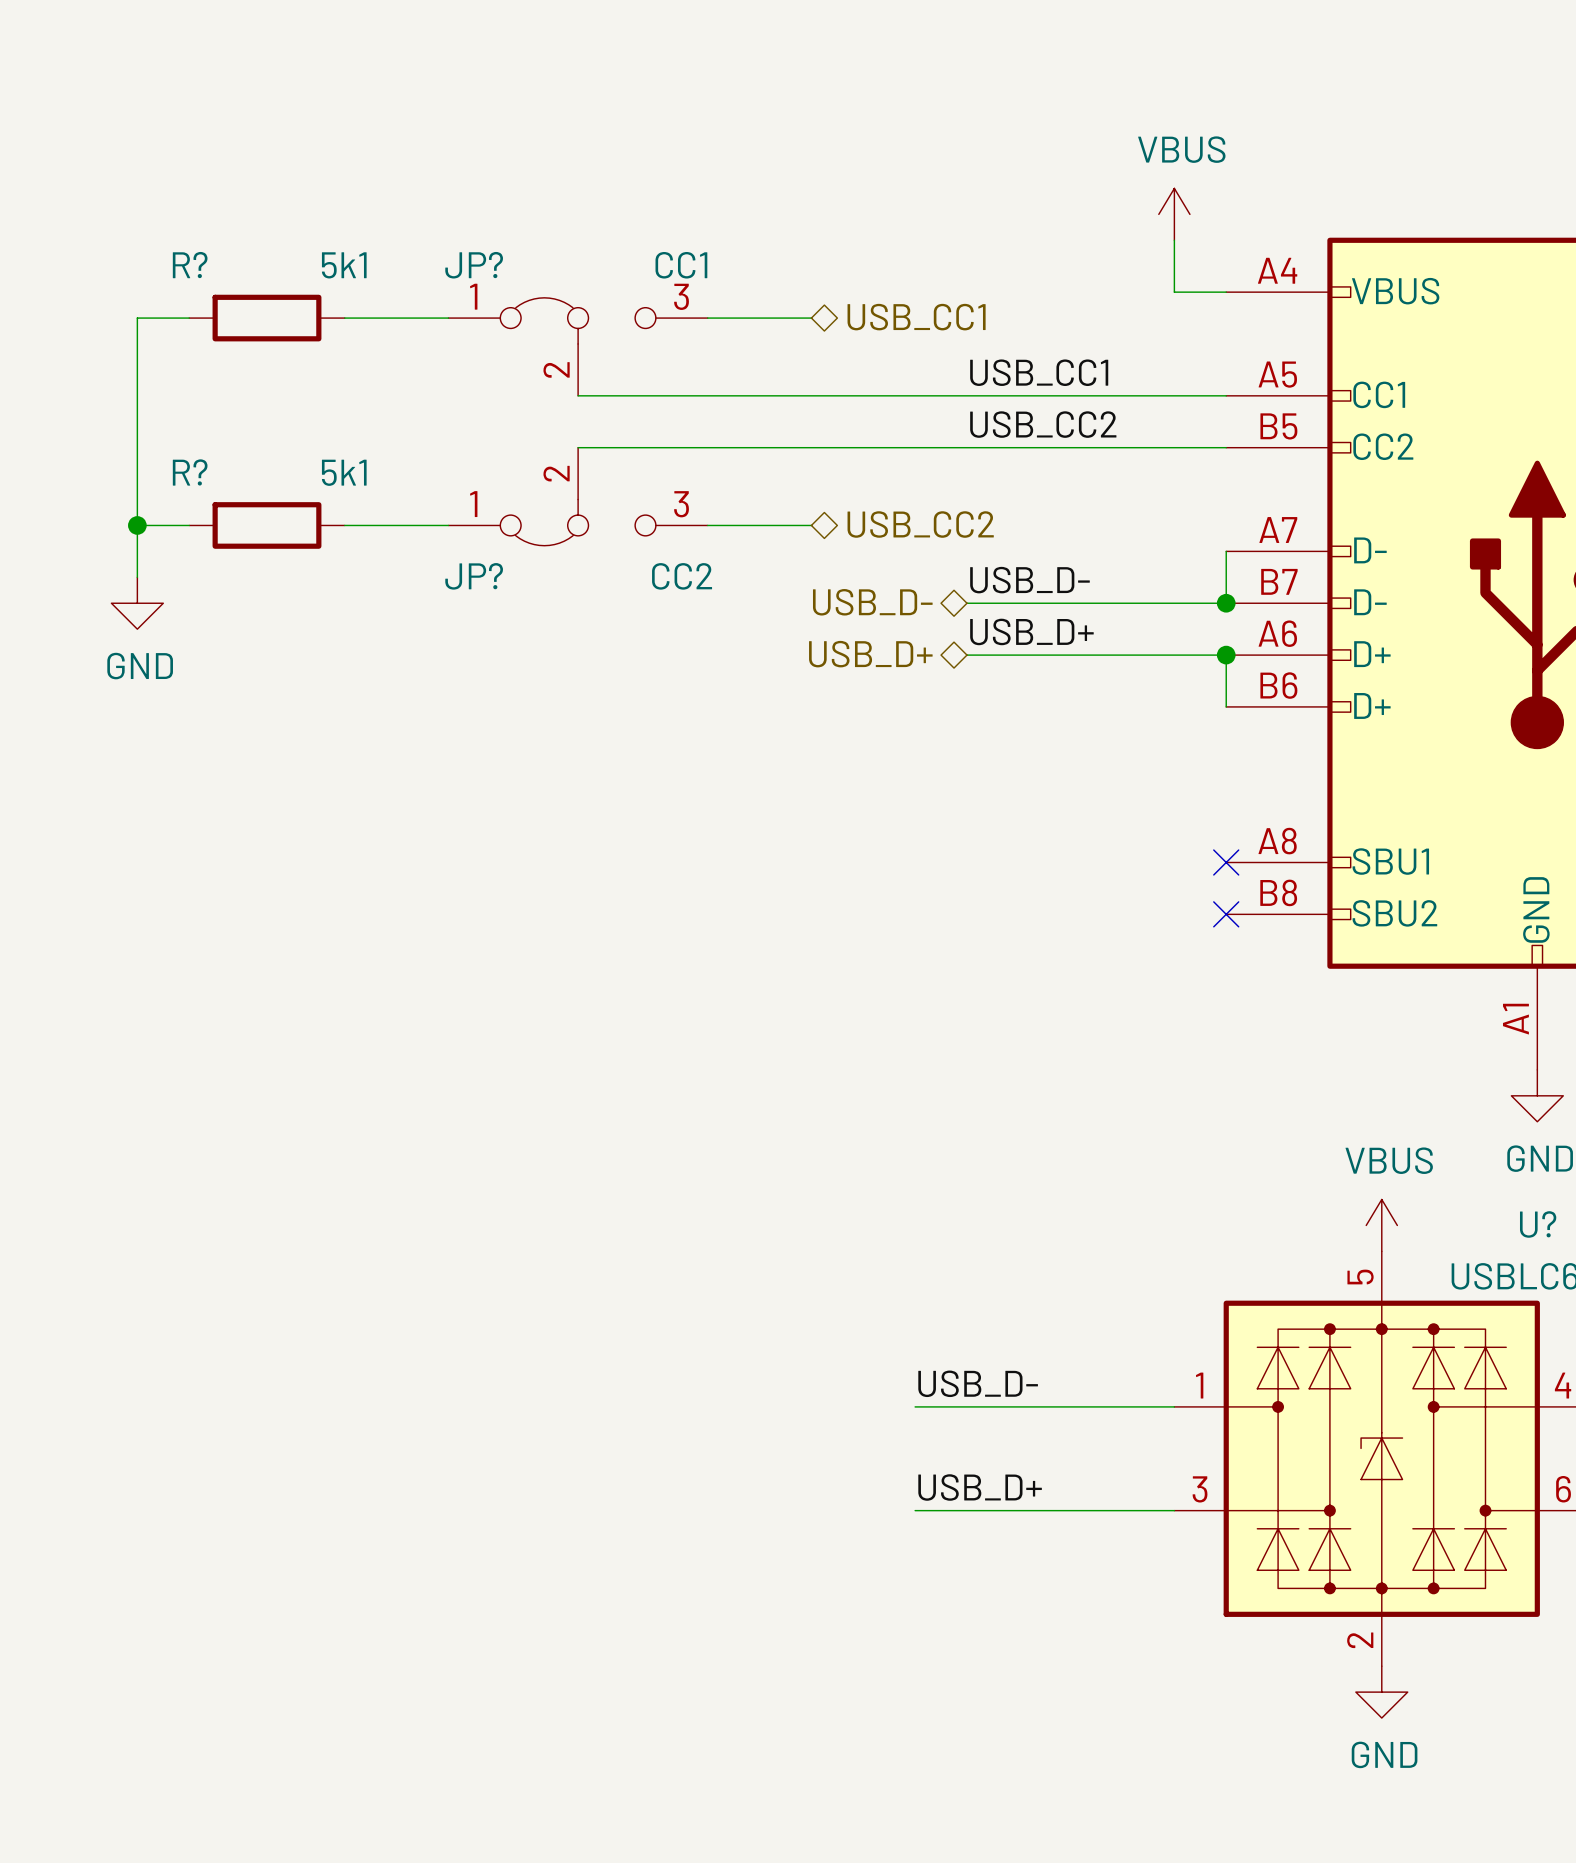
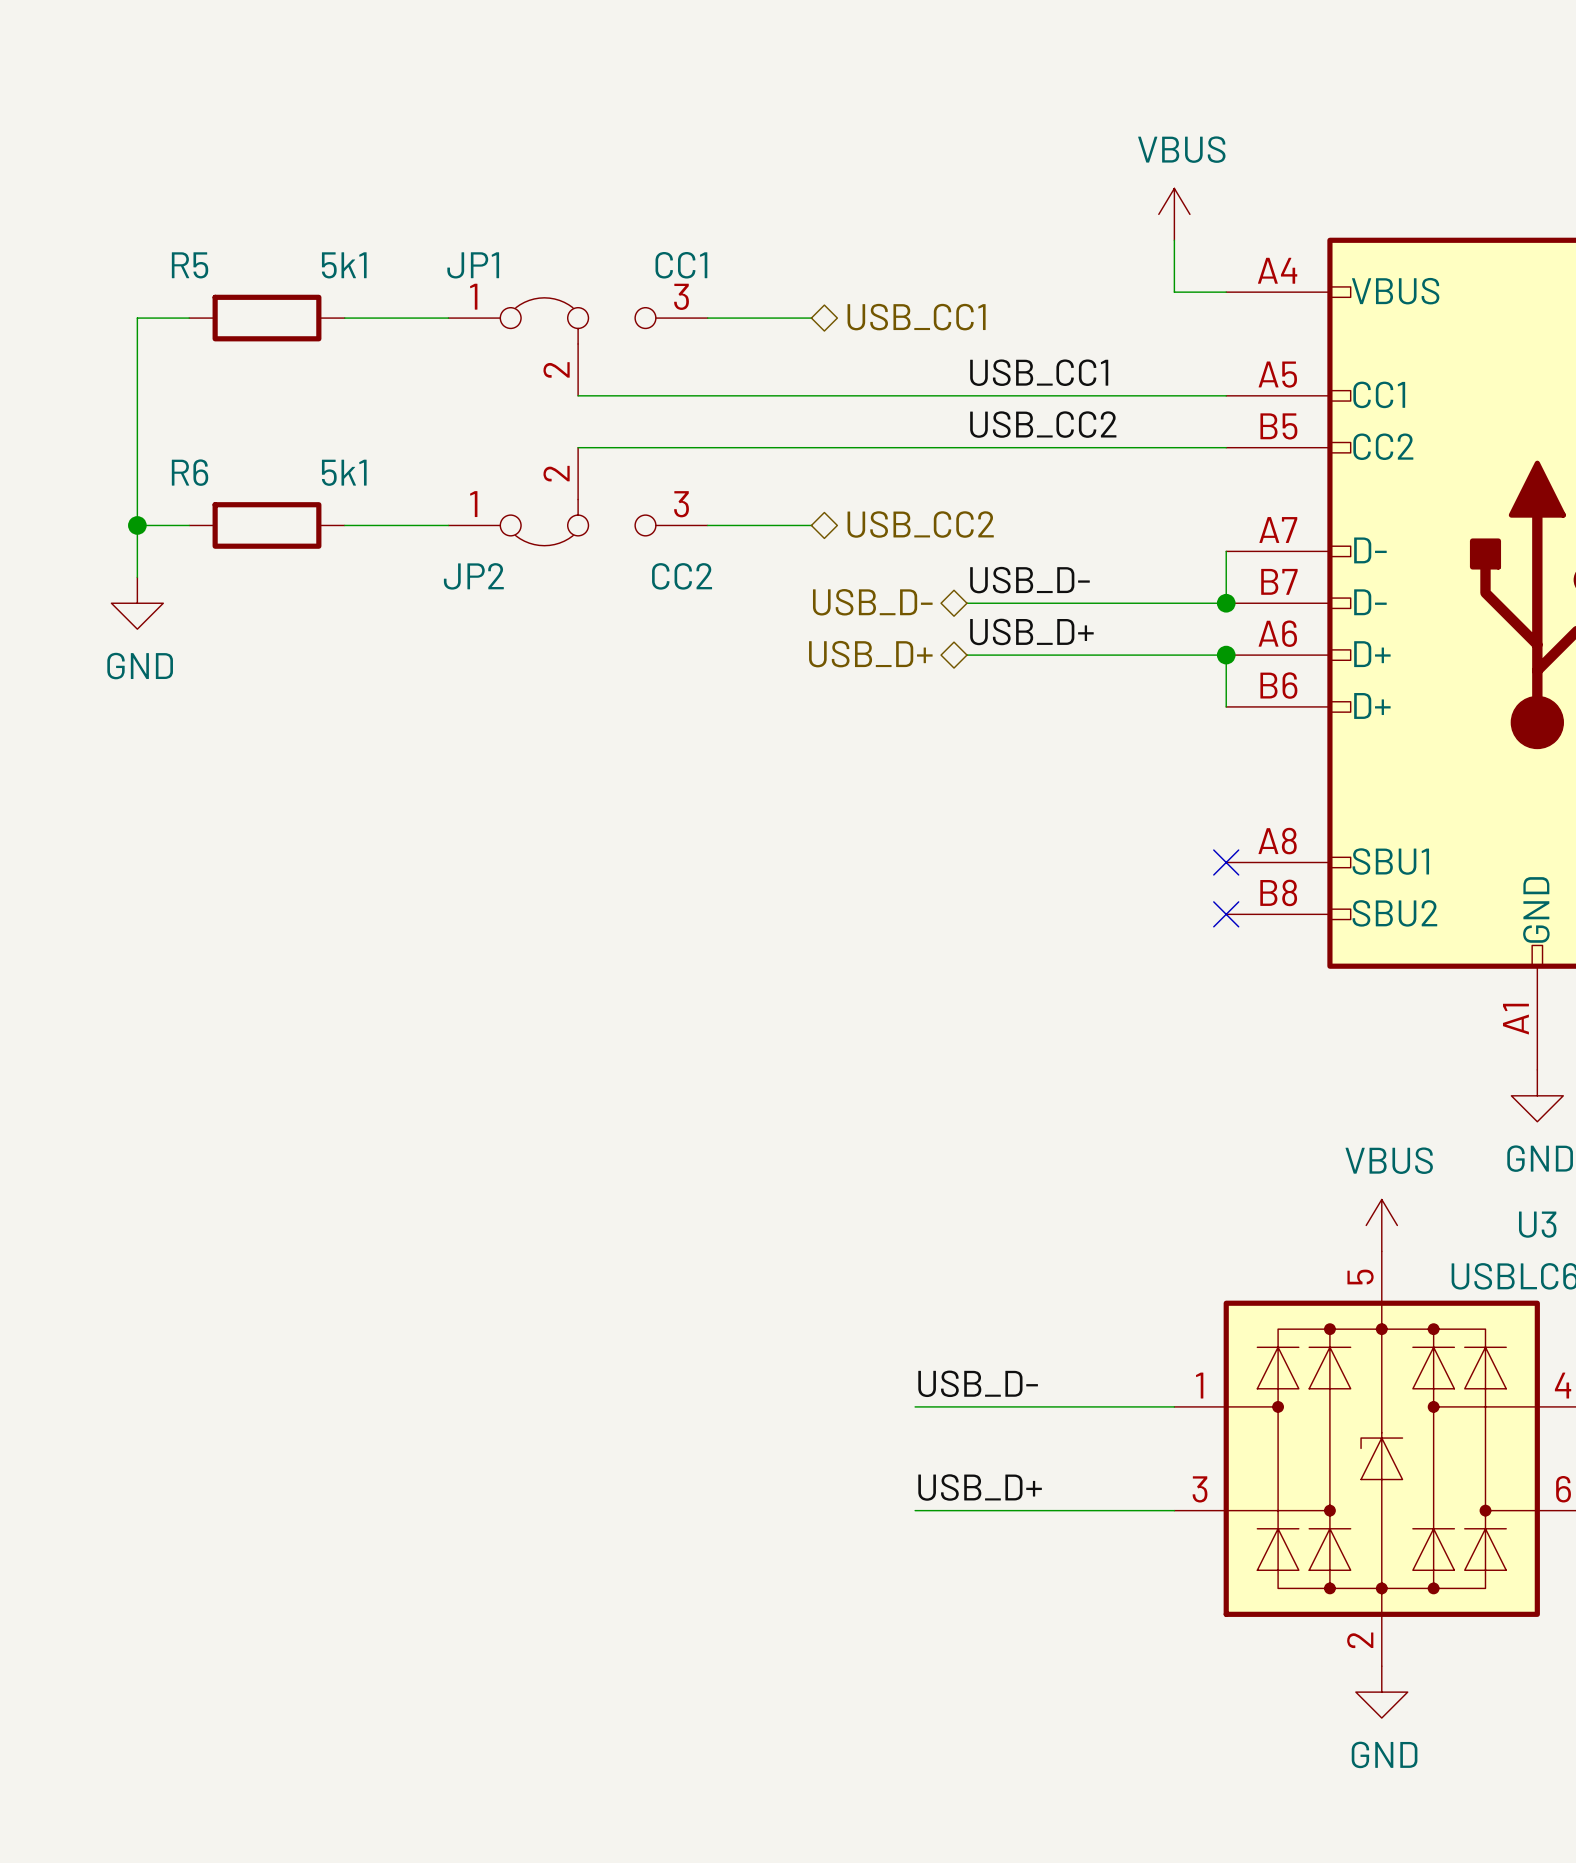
R? name: R? (190, 265) -> R5 (190, 265)
JP? name: JP? (474, 265) -> JP1 (473, 265)
R? name: R? (190, 472) -> R6 (190, 472)
JP? name: JP? (474, 576) -> JP2 (473, 576)
U? name: U? (1538, 1224) -> U3 (1537, 1224)

